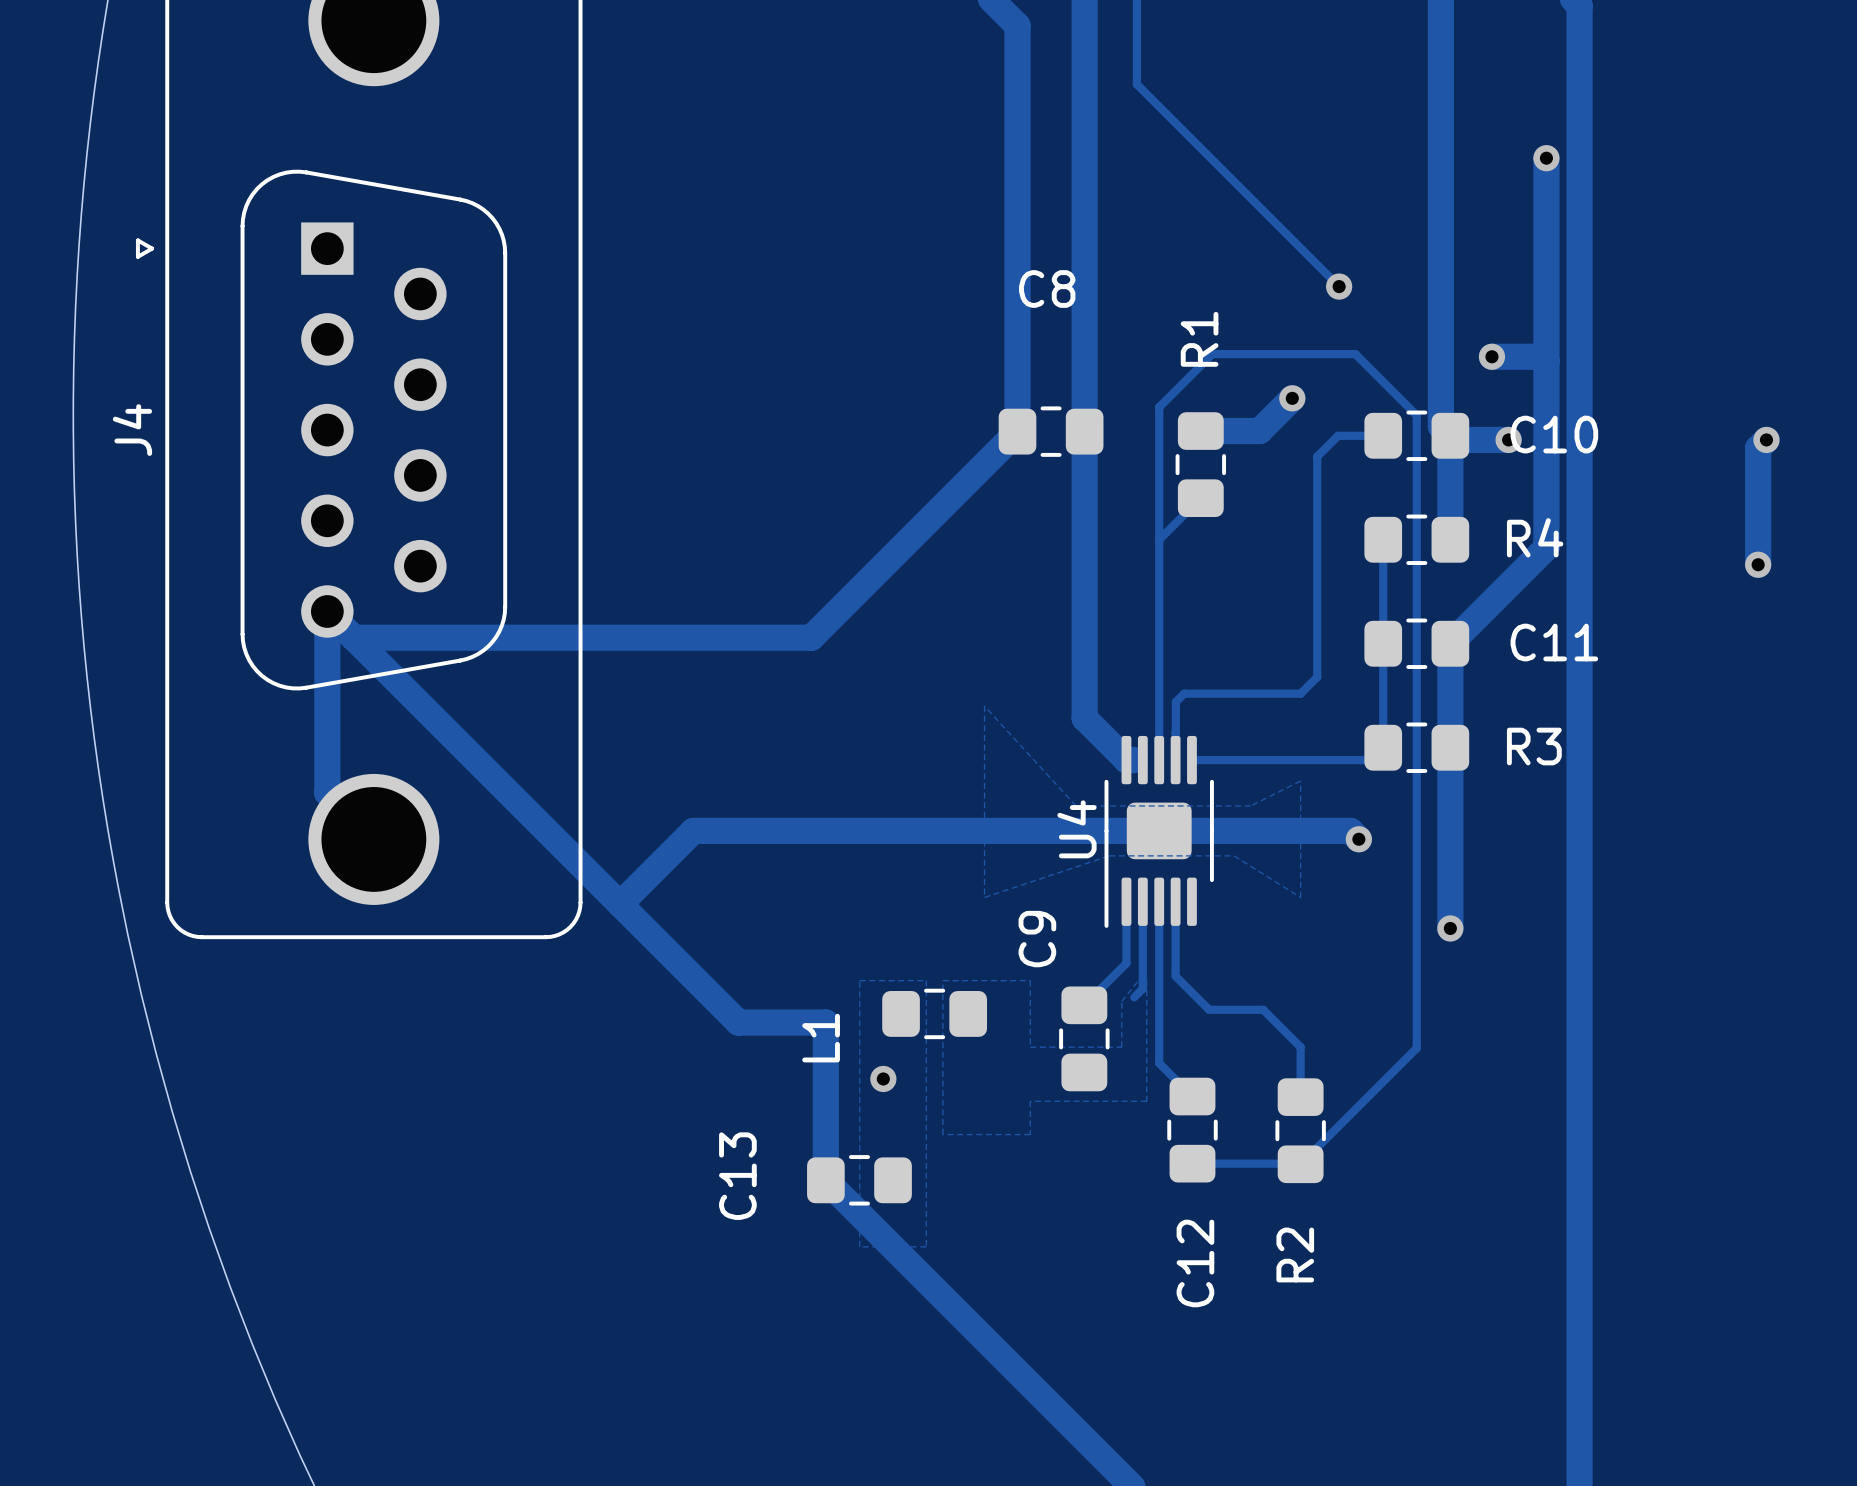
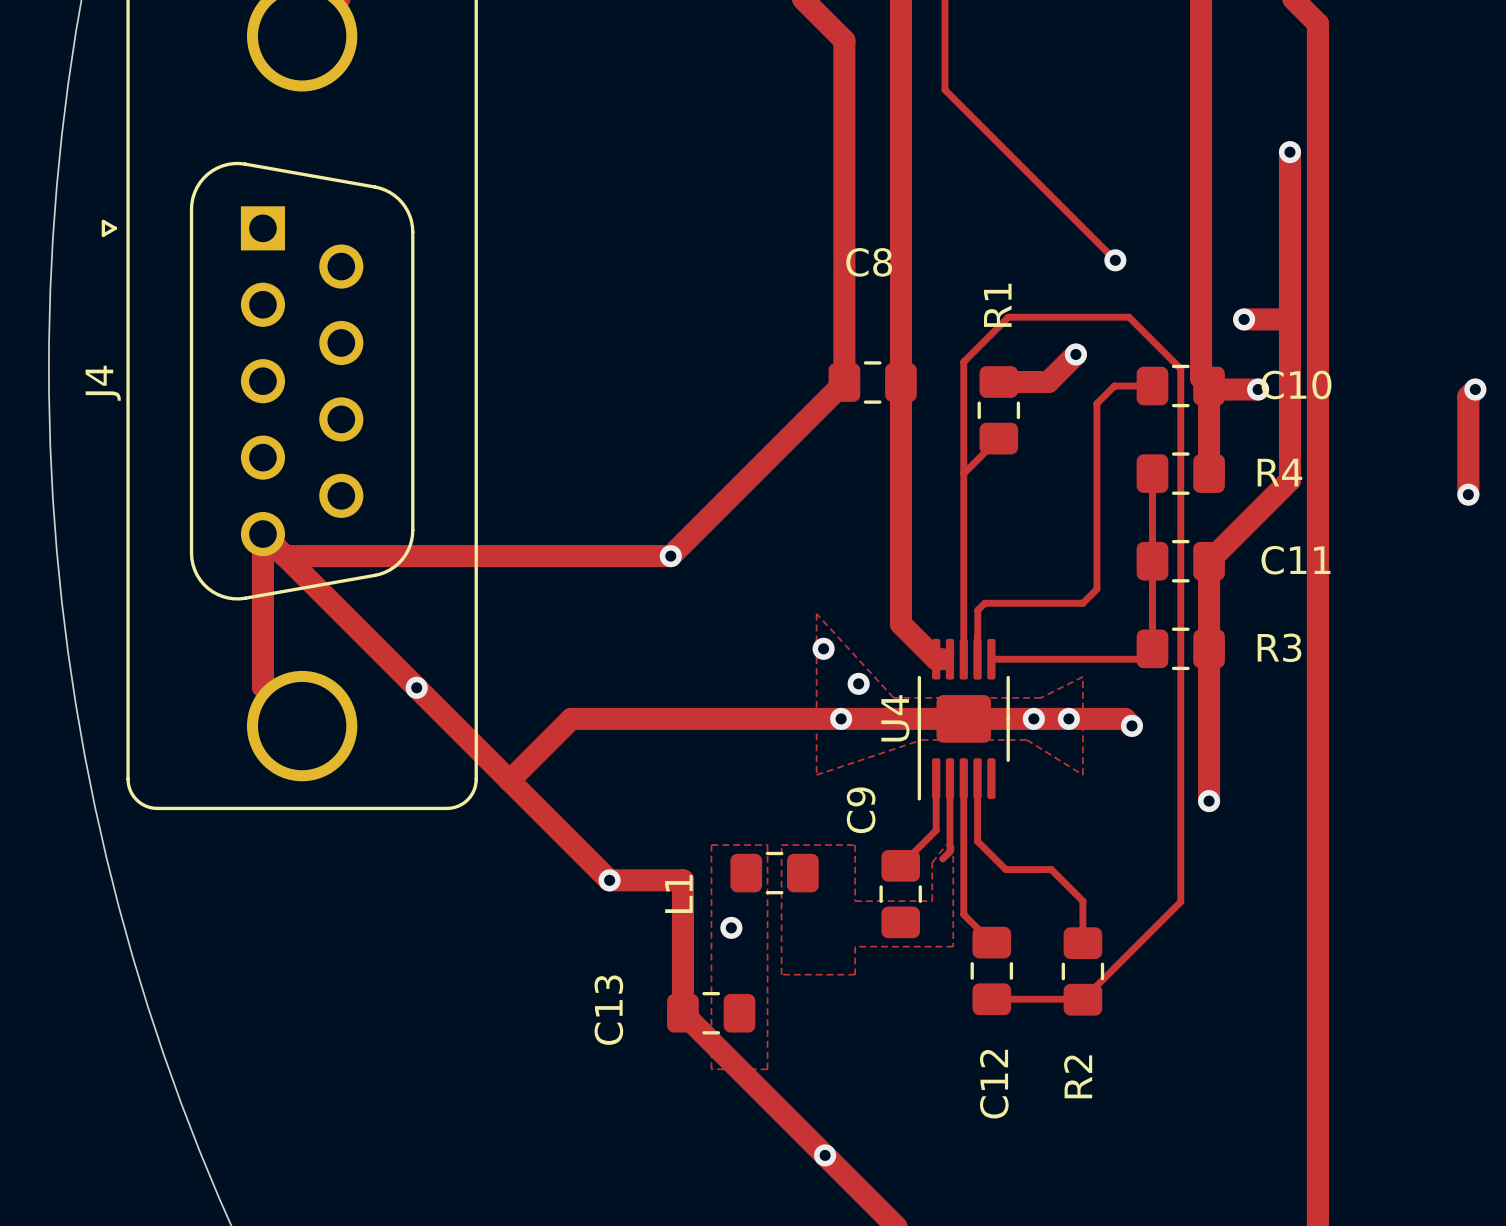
via: none -> (670, 556)
via: none -> (823, 648)
via: none -> (858, 683)
via: none -> (416, 687)
via: none -> (841, 718)
via: none -> (1033, 718)
via: none -> (1068, 718)
via: none -> (609, 880)
via: none -> (825, 1155)

